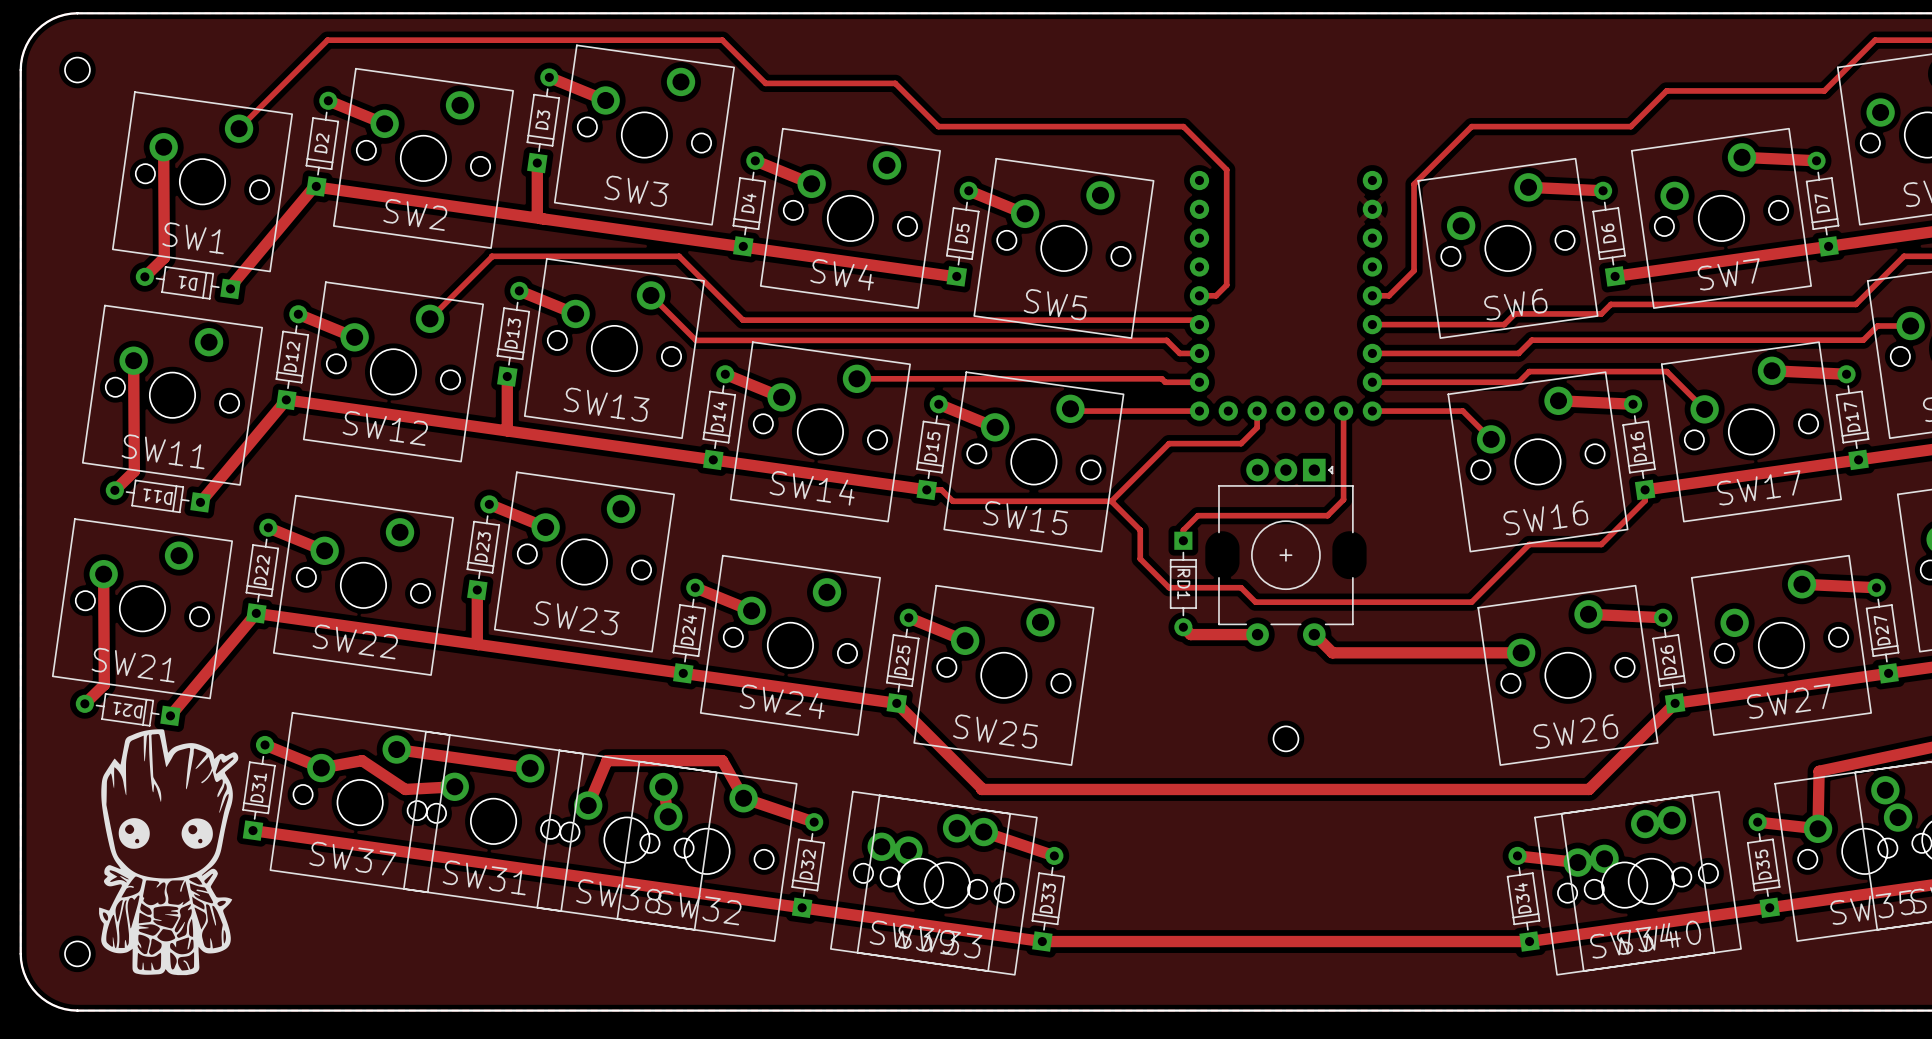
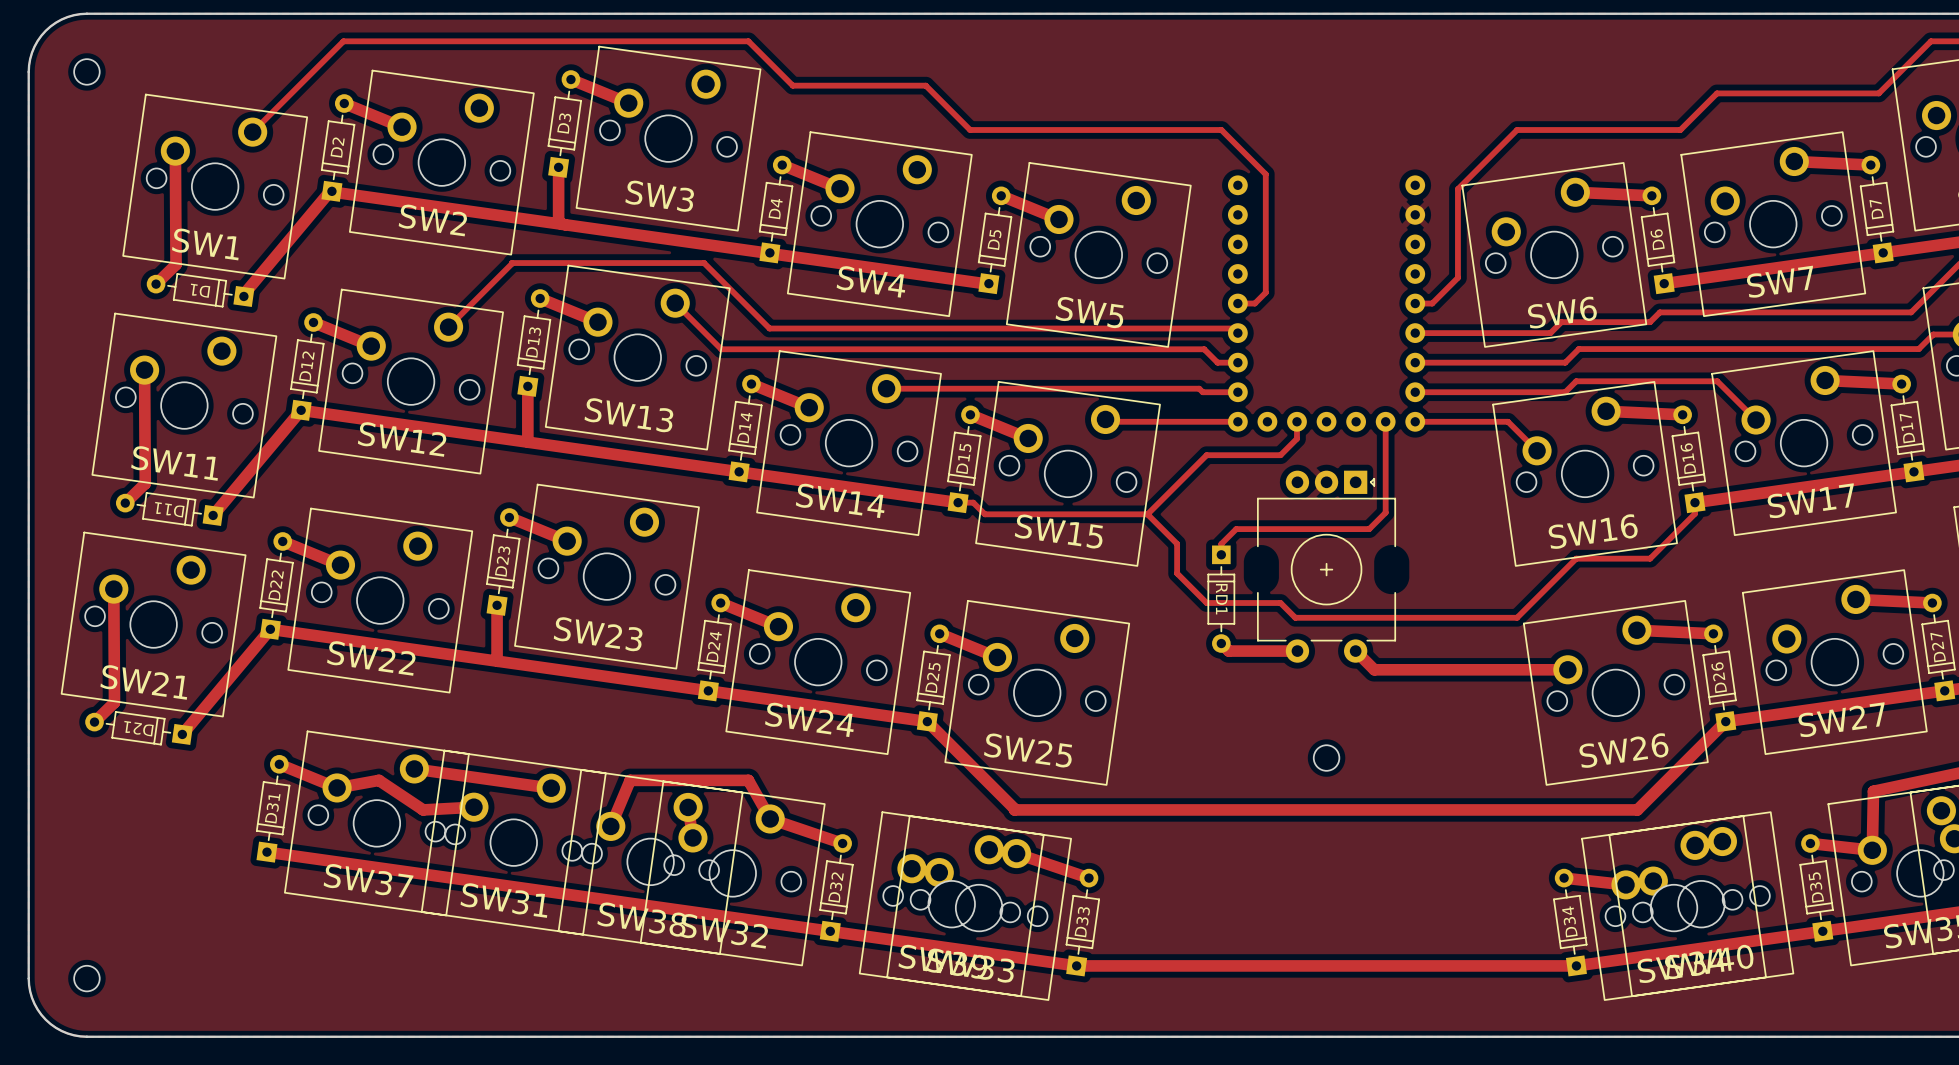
drawing: [99, 729, 239, 976] -> none

